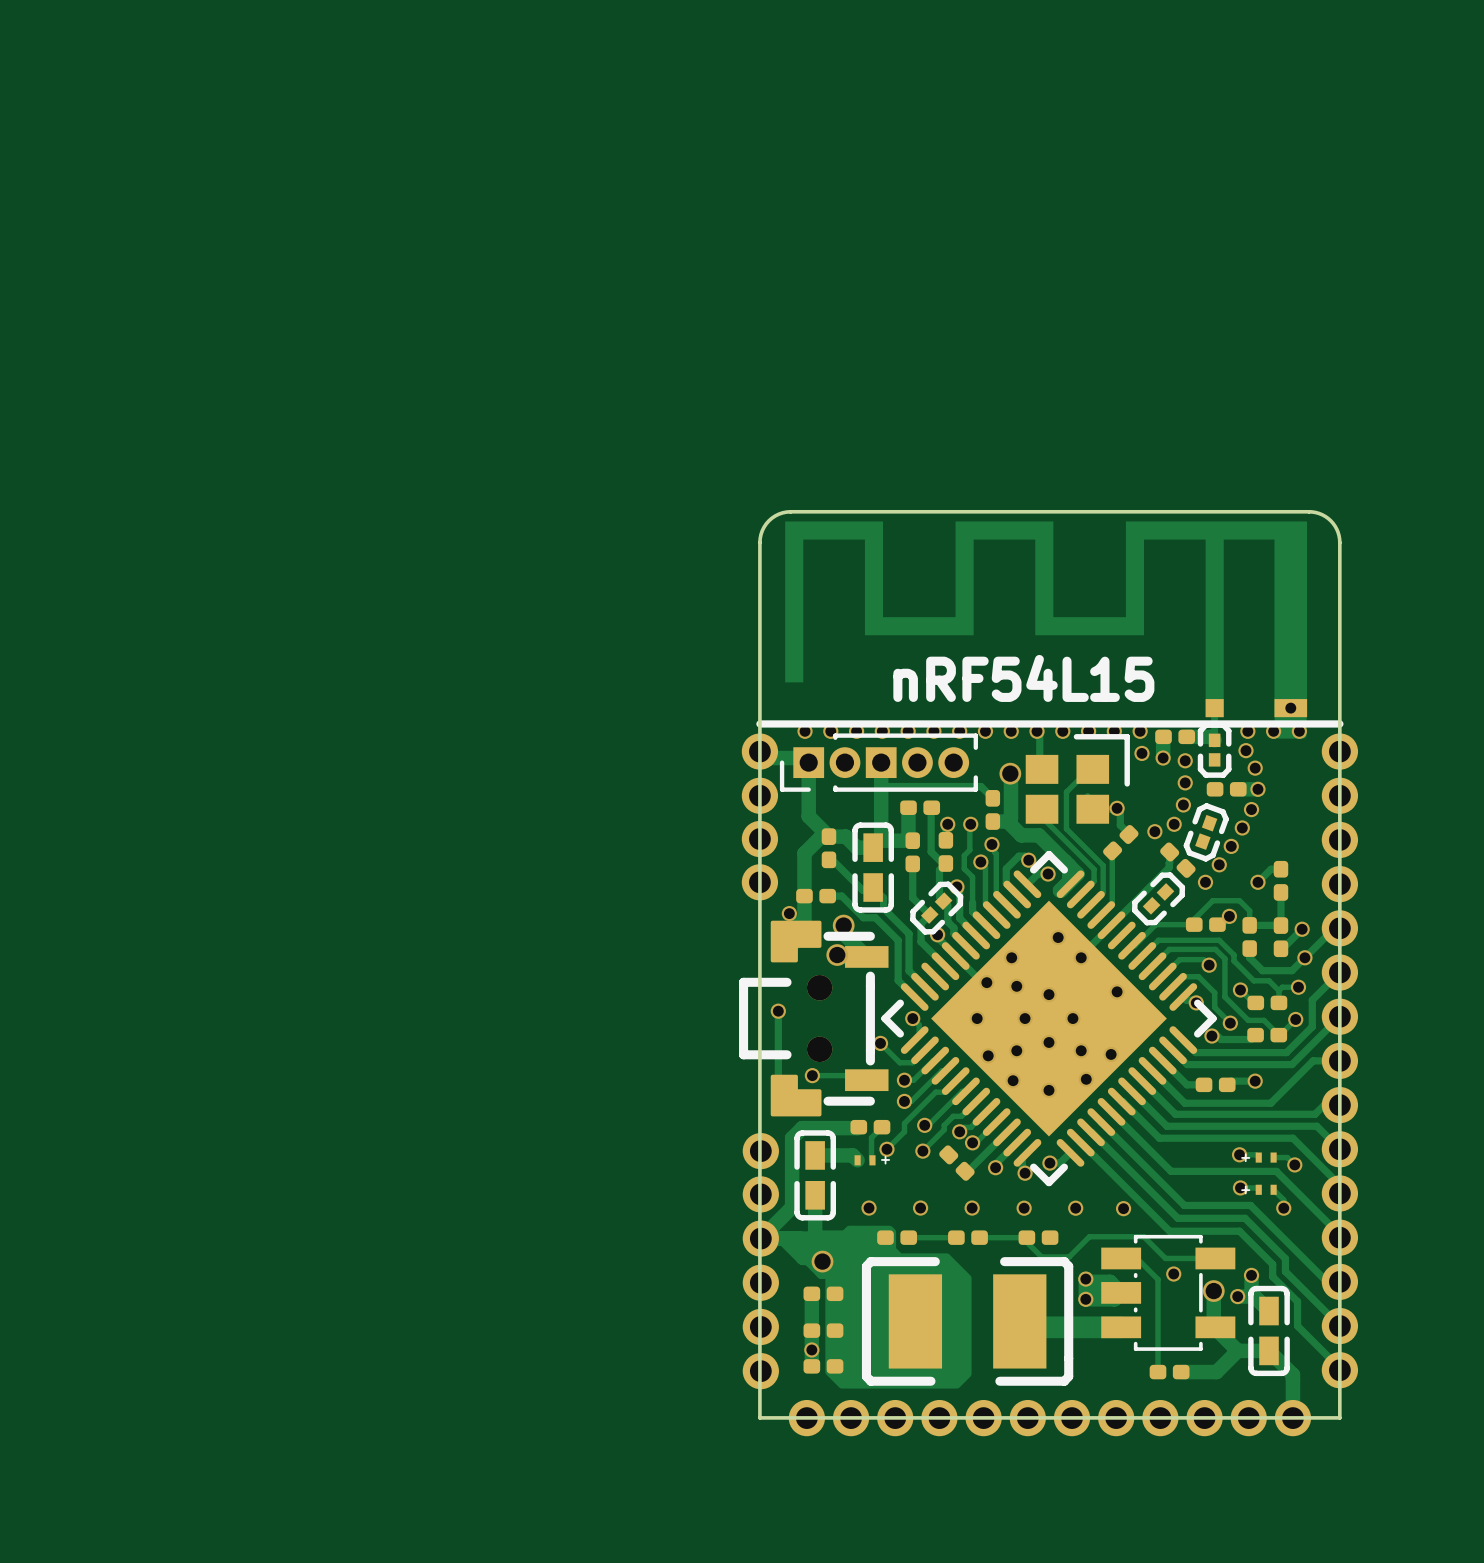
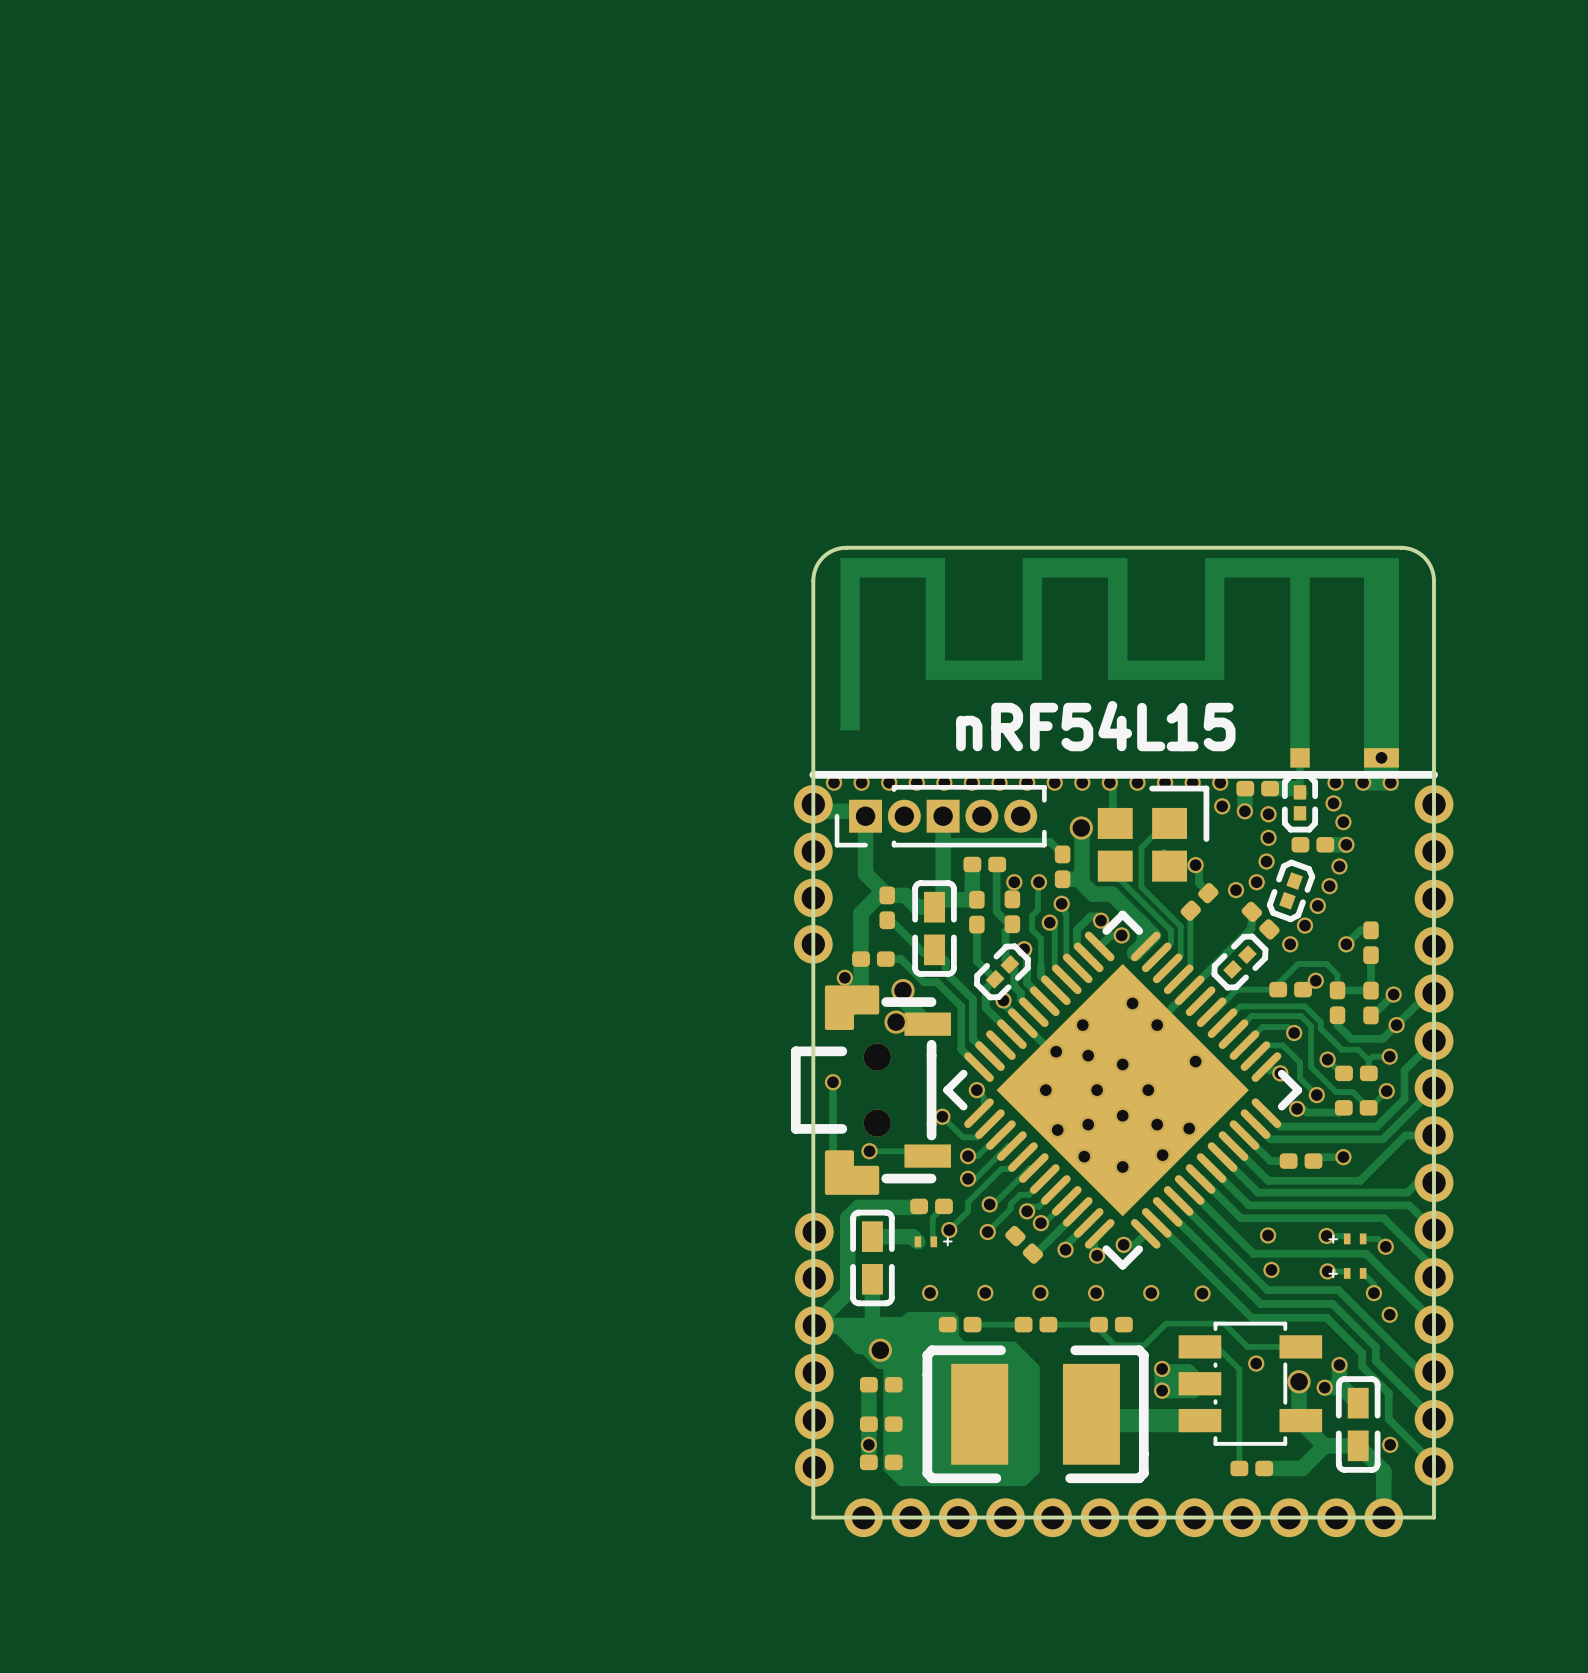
via: none -> (834, 782)
via: none -> (1268, 1235)
via: none -> (1271, 1269)
via: none -> (1389, 1314)
via: none -> (1390, 1444)

